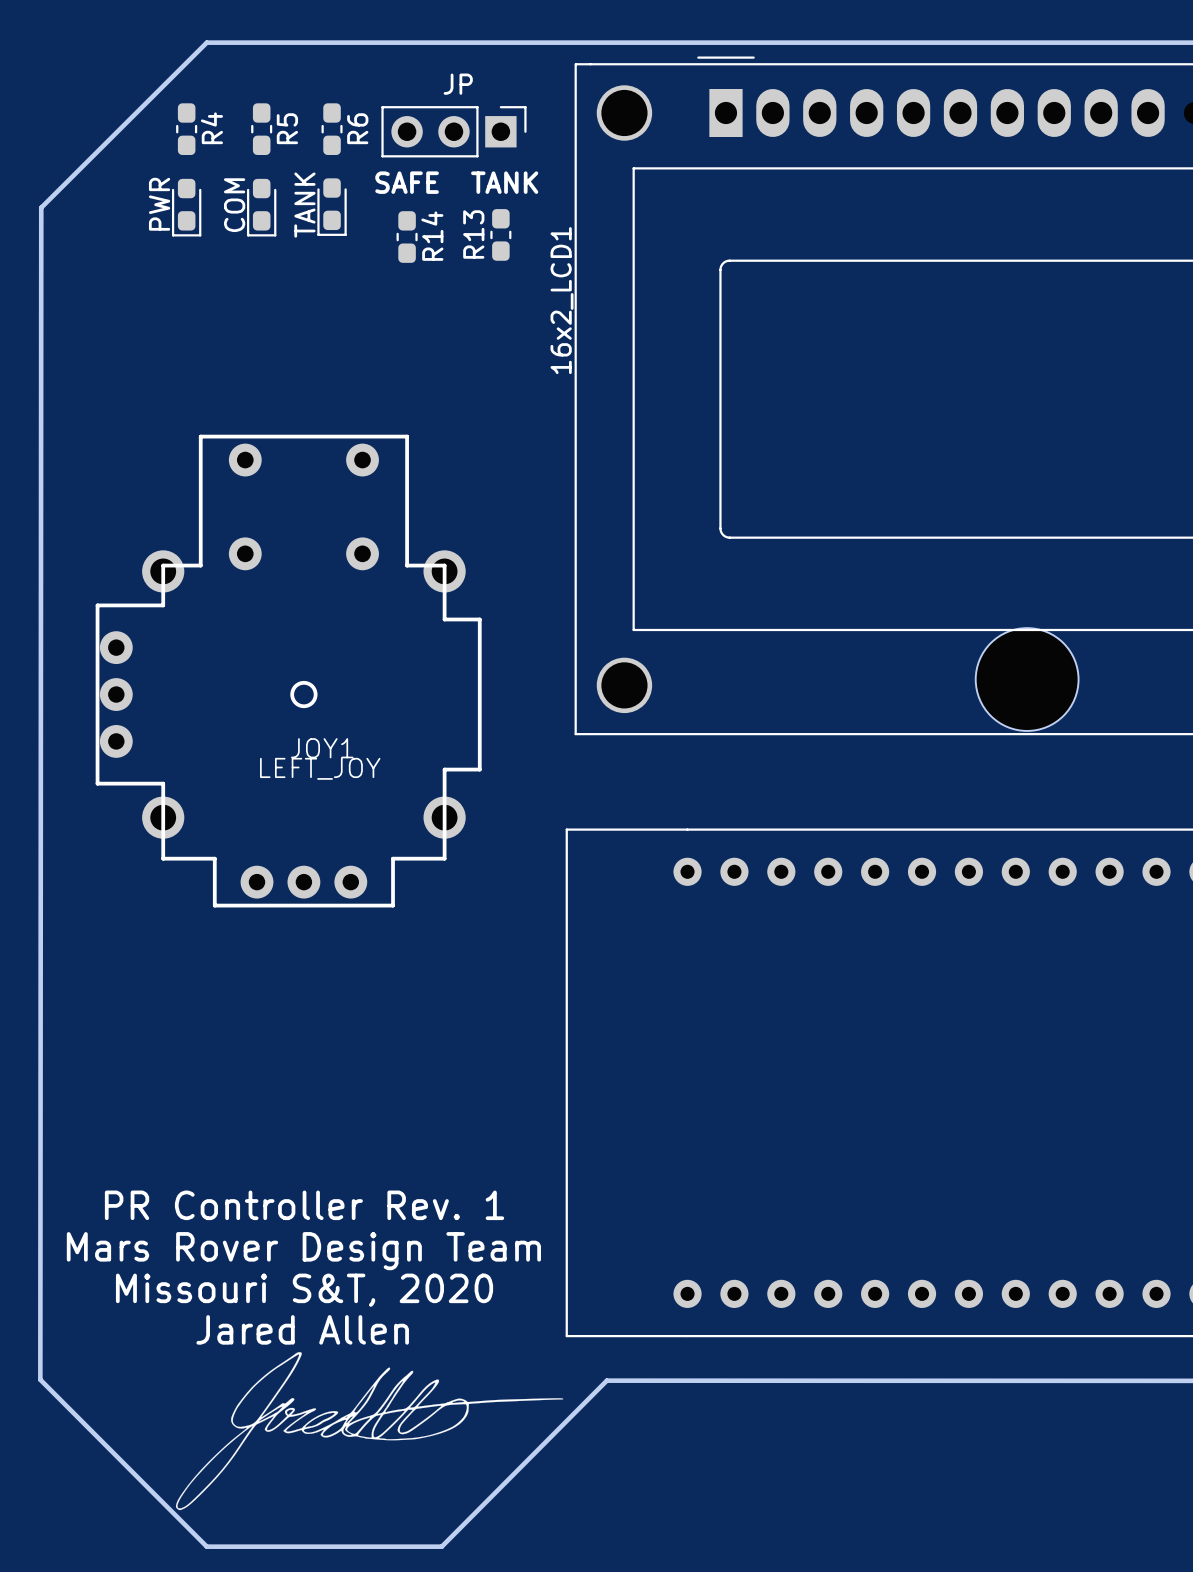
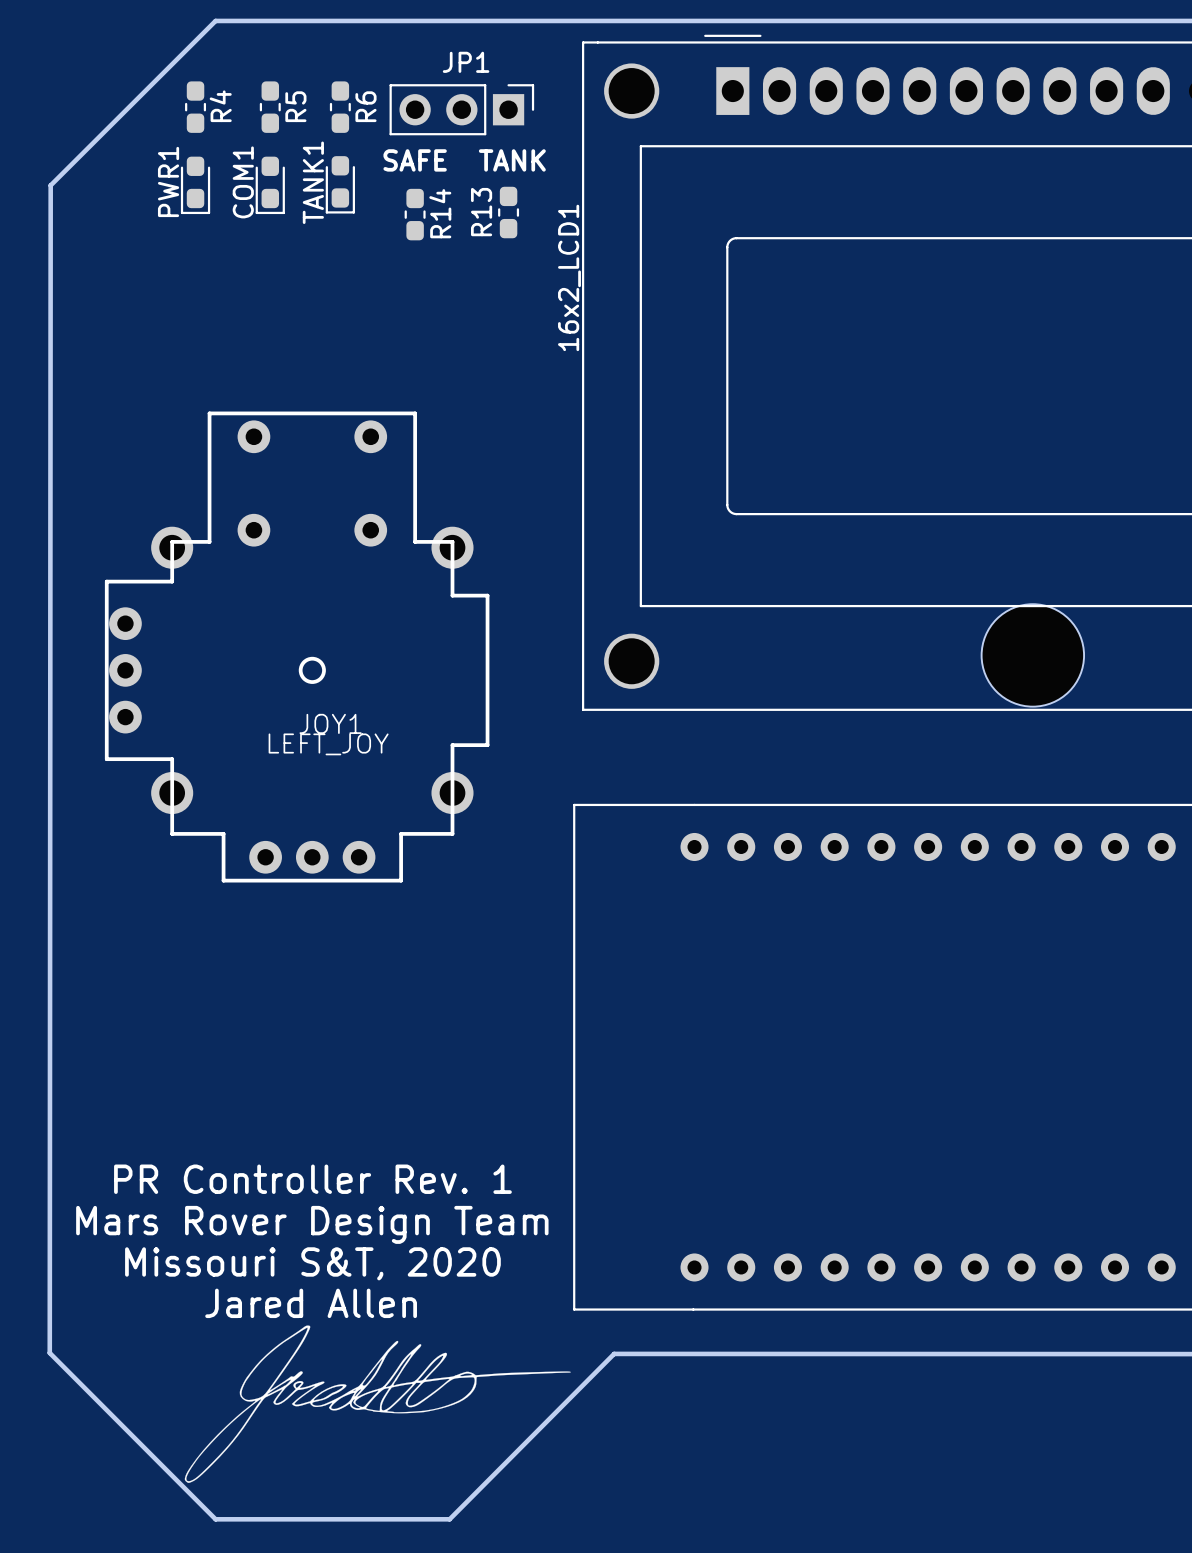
JP name: JP (458, 84) -> JP1 (466, 62)
PWR name: PWR (159, 204) -> PWR1 (168, 181)
COM name: COM (234, 205) -> COM1 (243, 182)
TANK name: TANK (304, 205) -> TANK1 (313, 182)

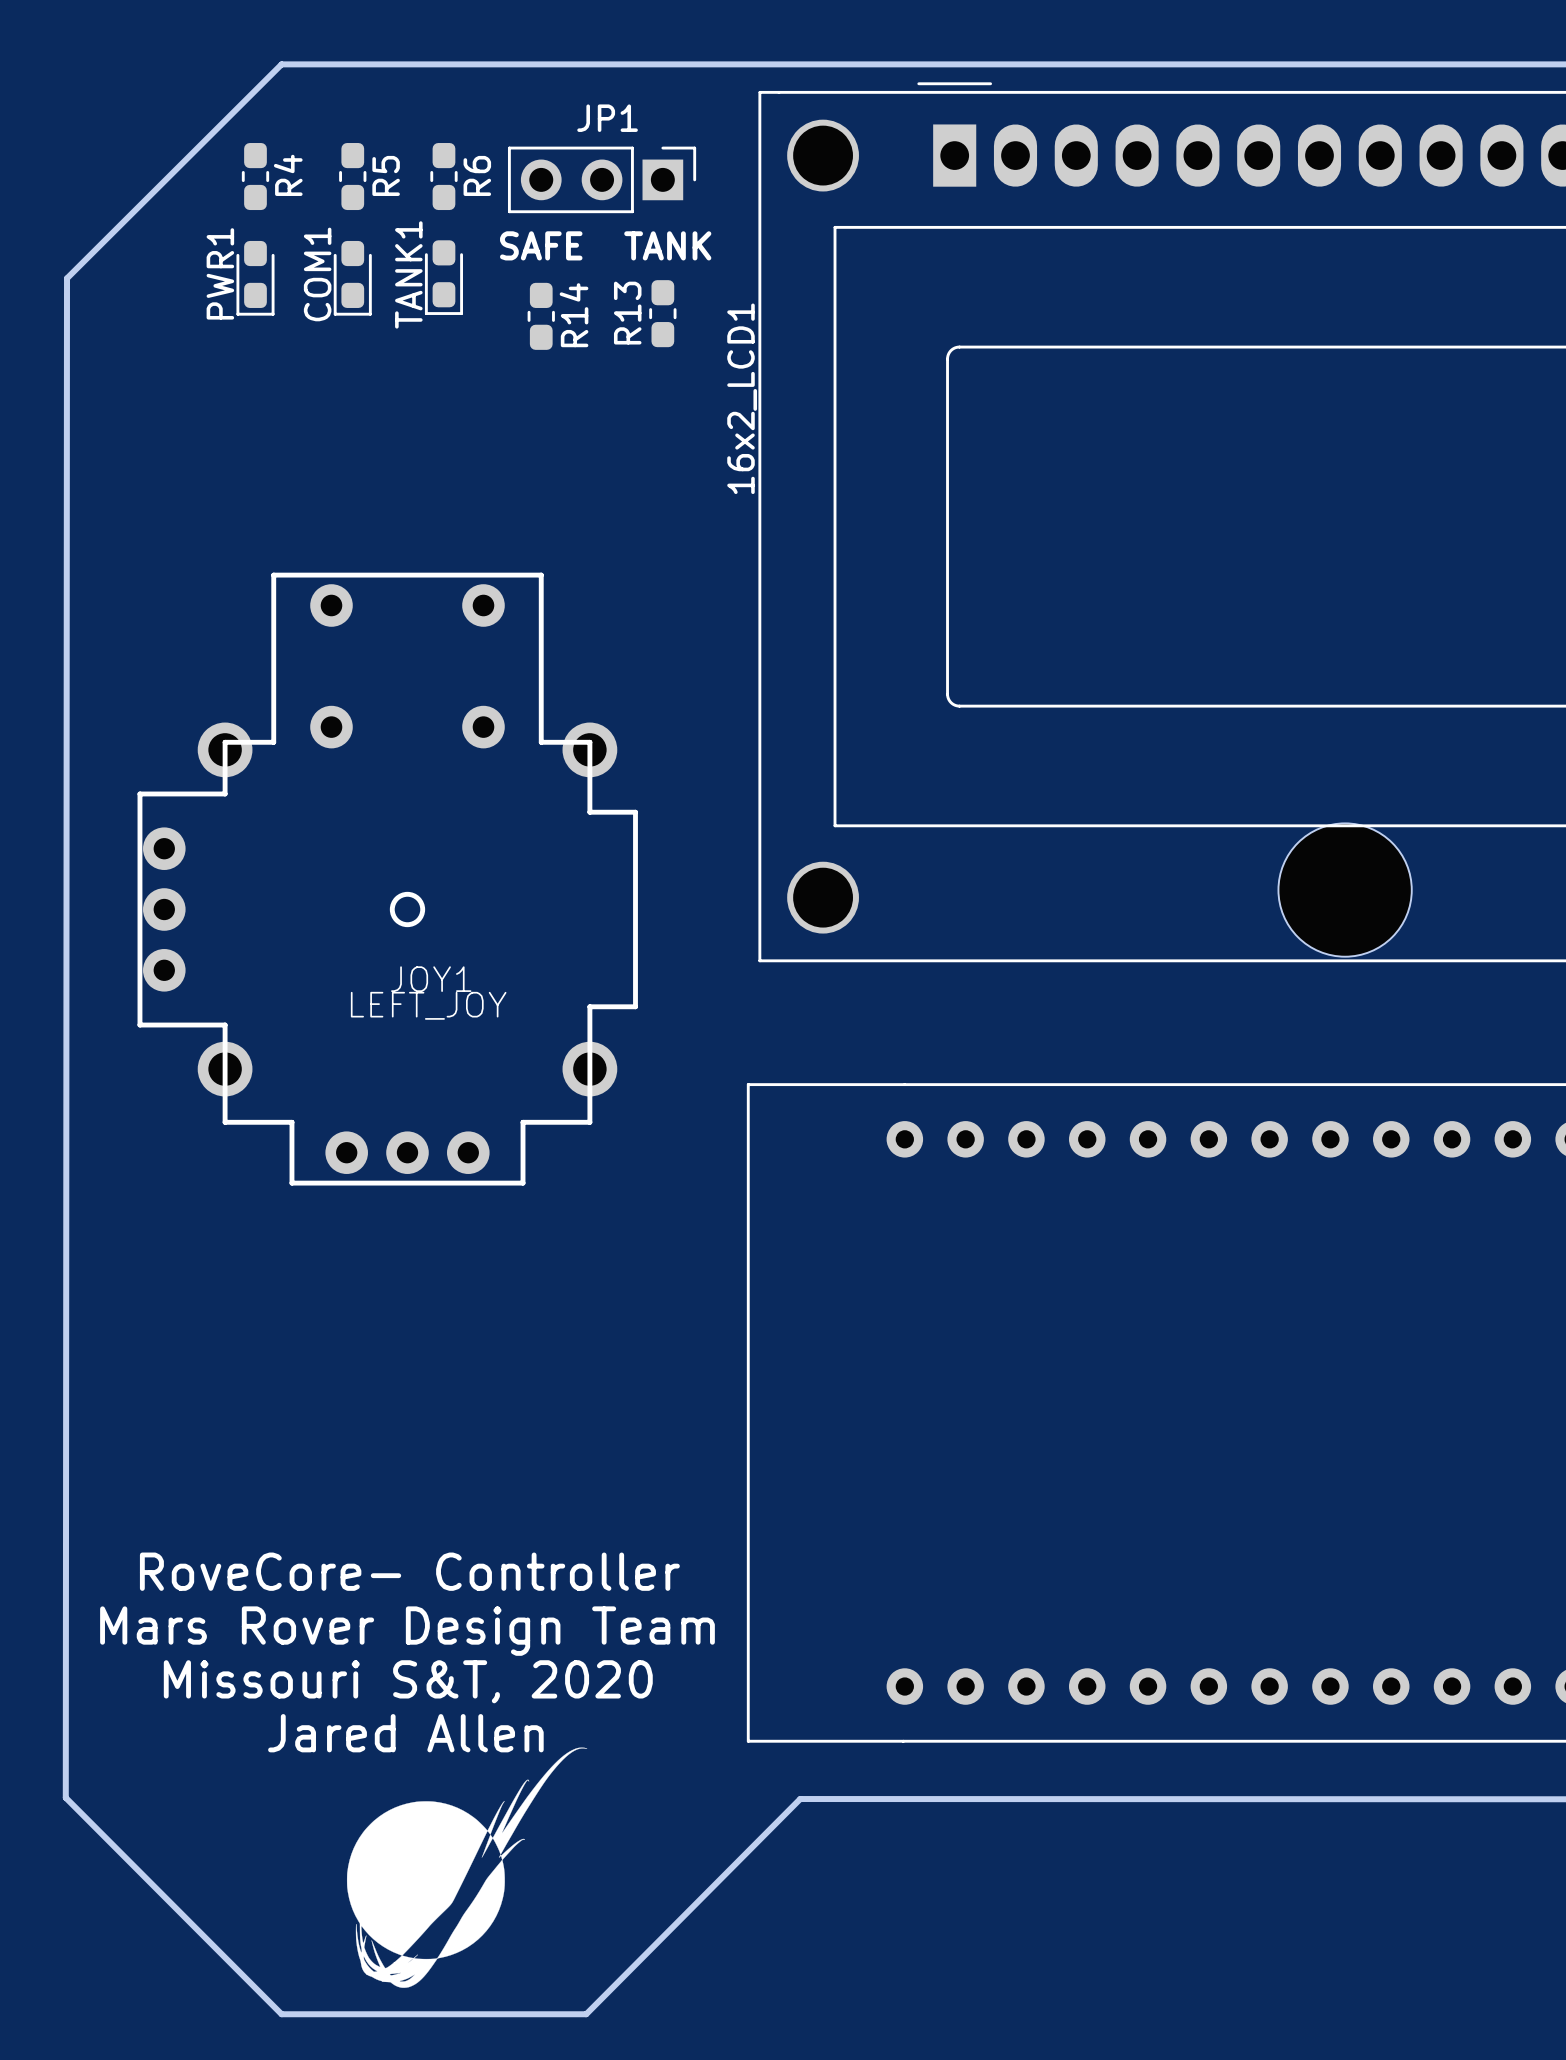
text: PR Controller Rev. 1 (312, 1179) -> RoveCore- Controller (409, 1571)
drawing: none -> [346, 1747, 588, 1988]
drawing: [184, 1325, 571, 1483] -> none

